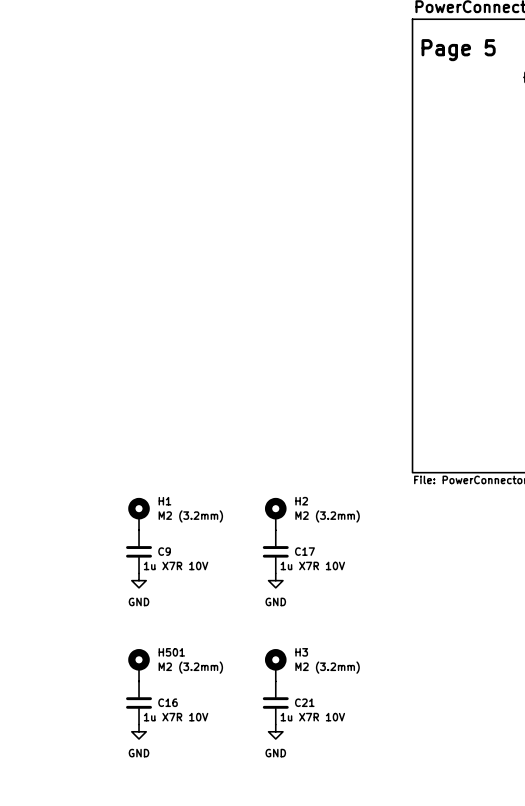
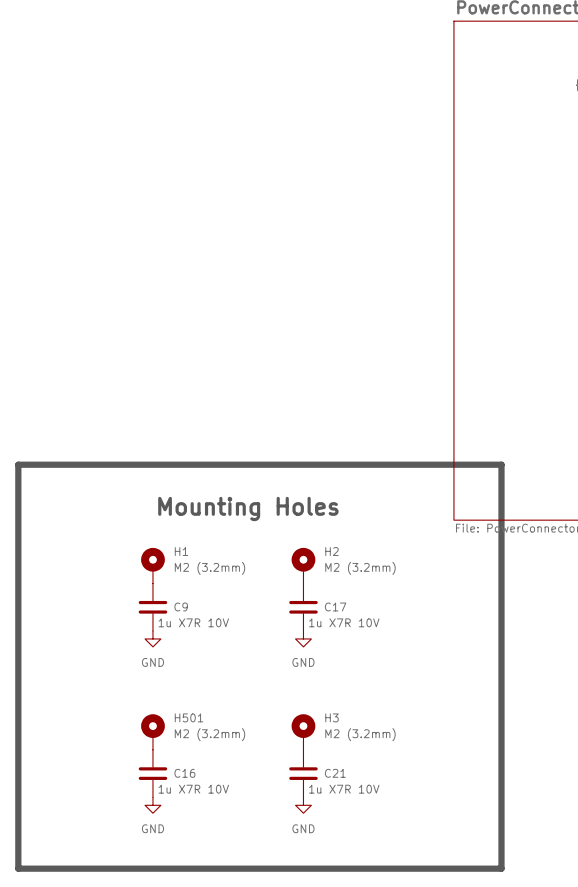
text: Page 5 (458, 50) -> none
line: none -> (18, 464) (501, 464) (501, 868) (18, 868) (18, 464)
text: none -> Mounting Holes (248, 508)

